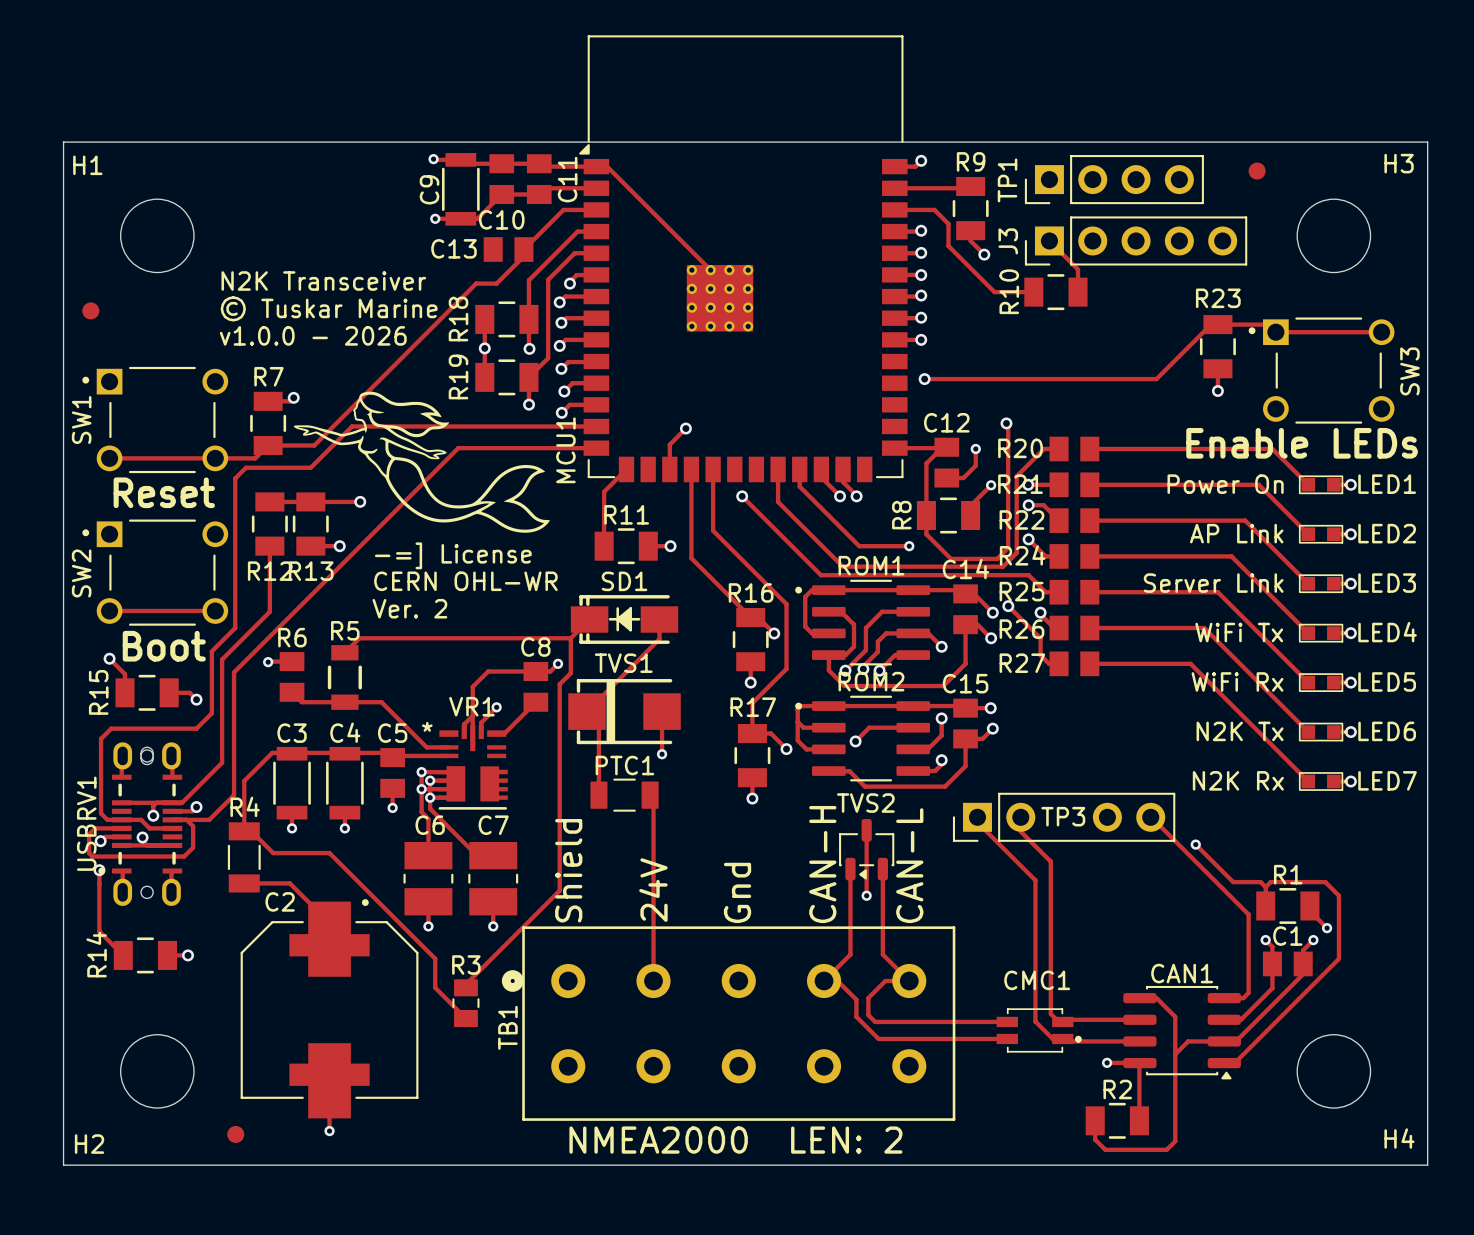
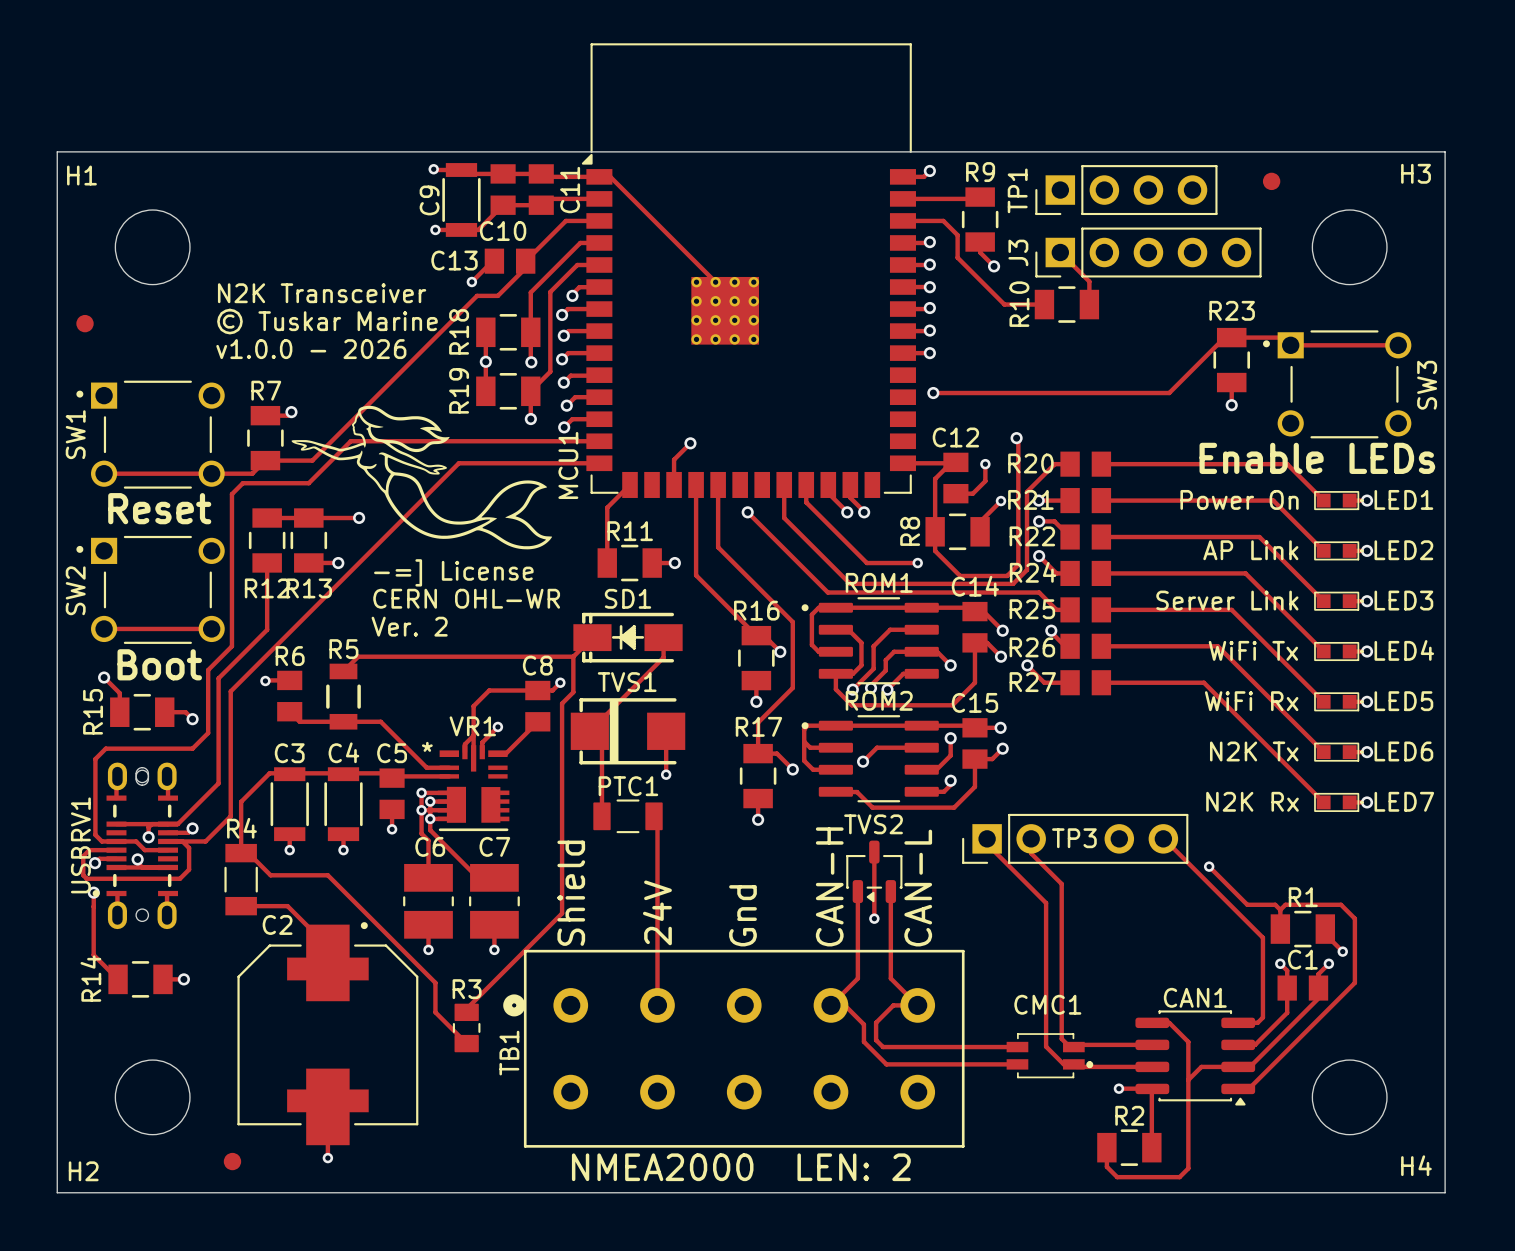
track: none -> (492, 261) (471, 281)
via: none -> (471, 281)
track: (1008, 606) (1040, 638) (1040, 655) (1049, 663) -> (1027, 665) (1044, 682) (1059, 682)
via position: (1008, 606) -> (1027, 665)

